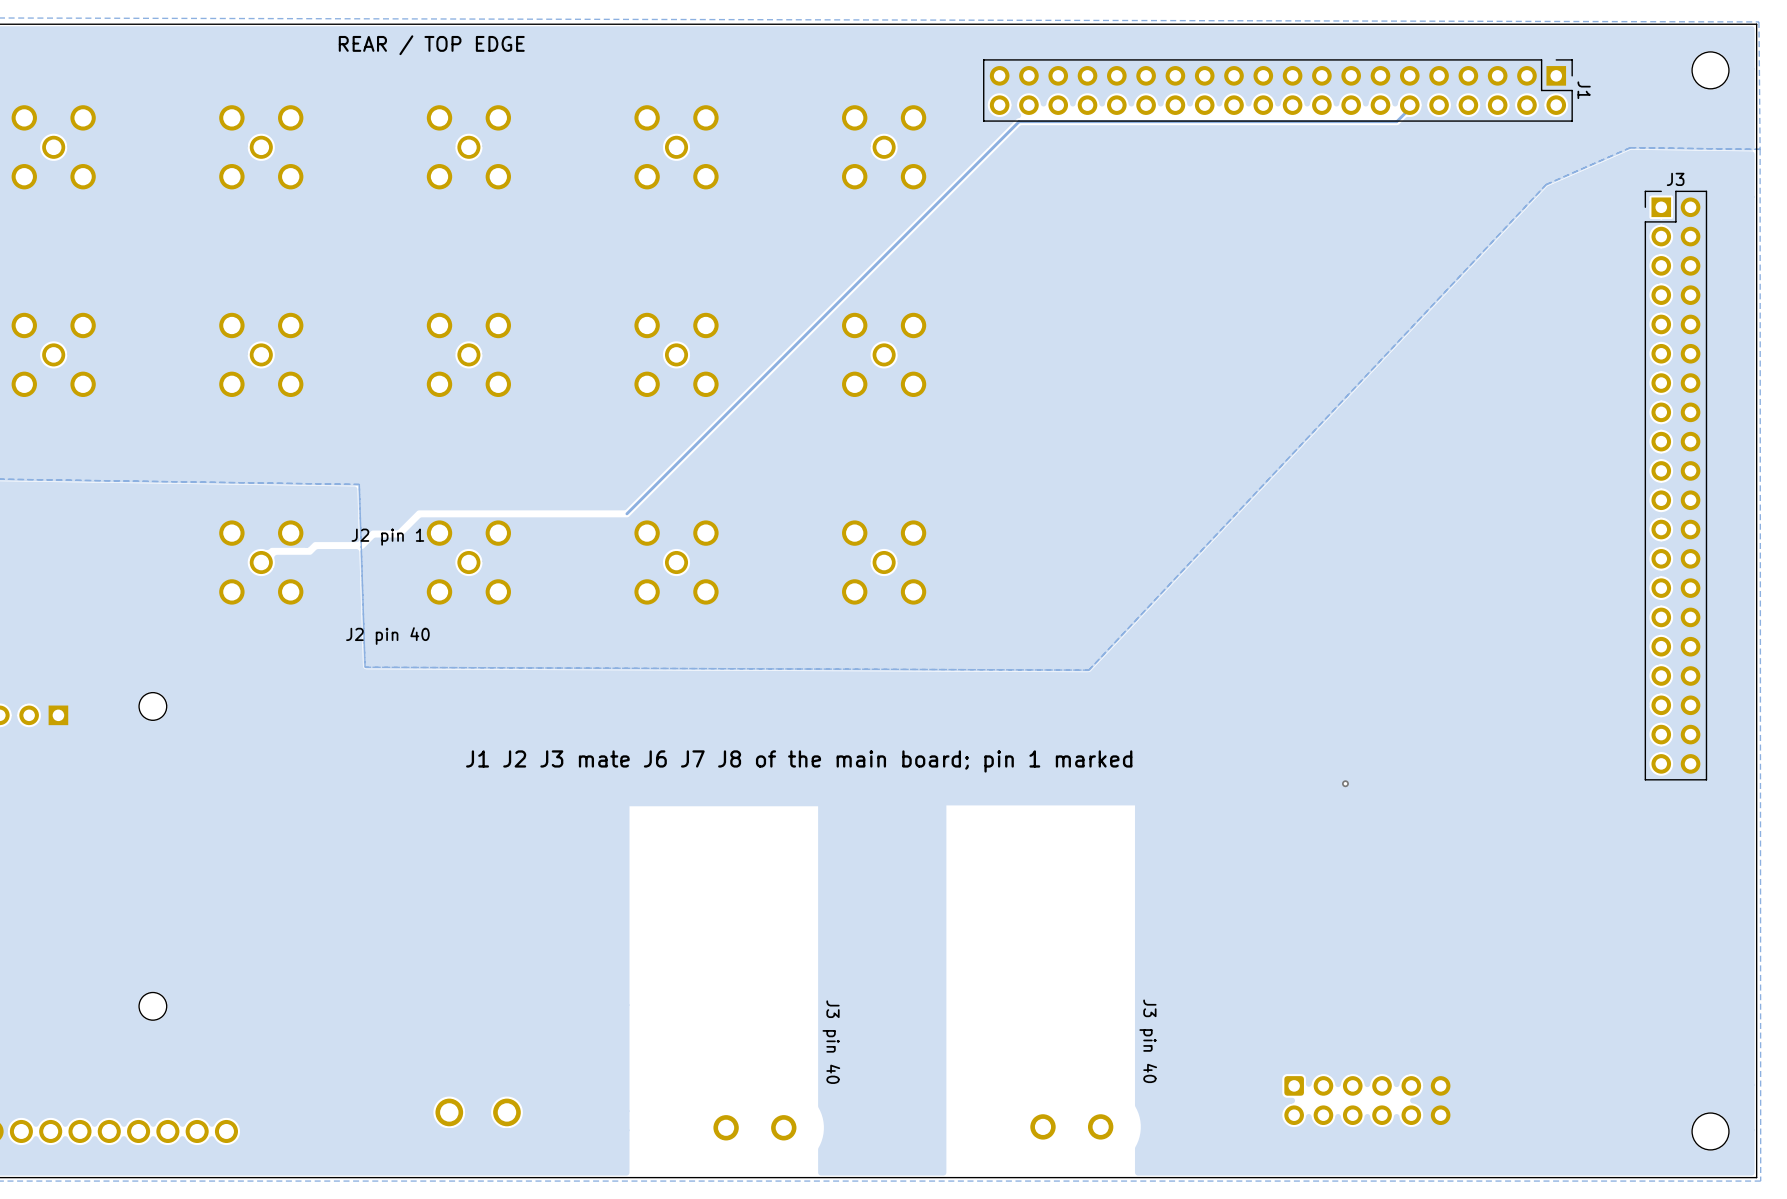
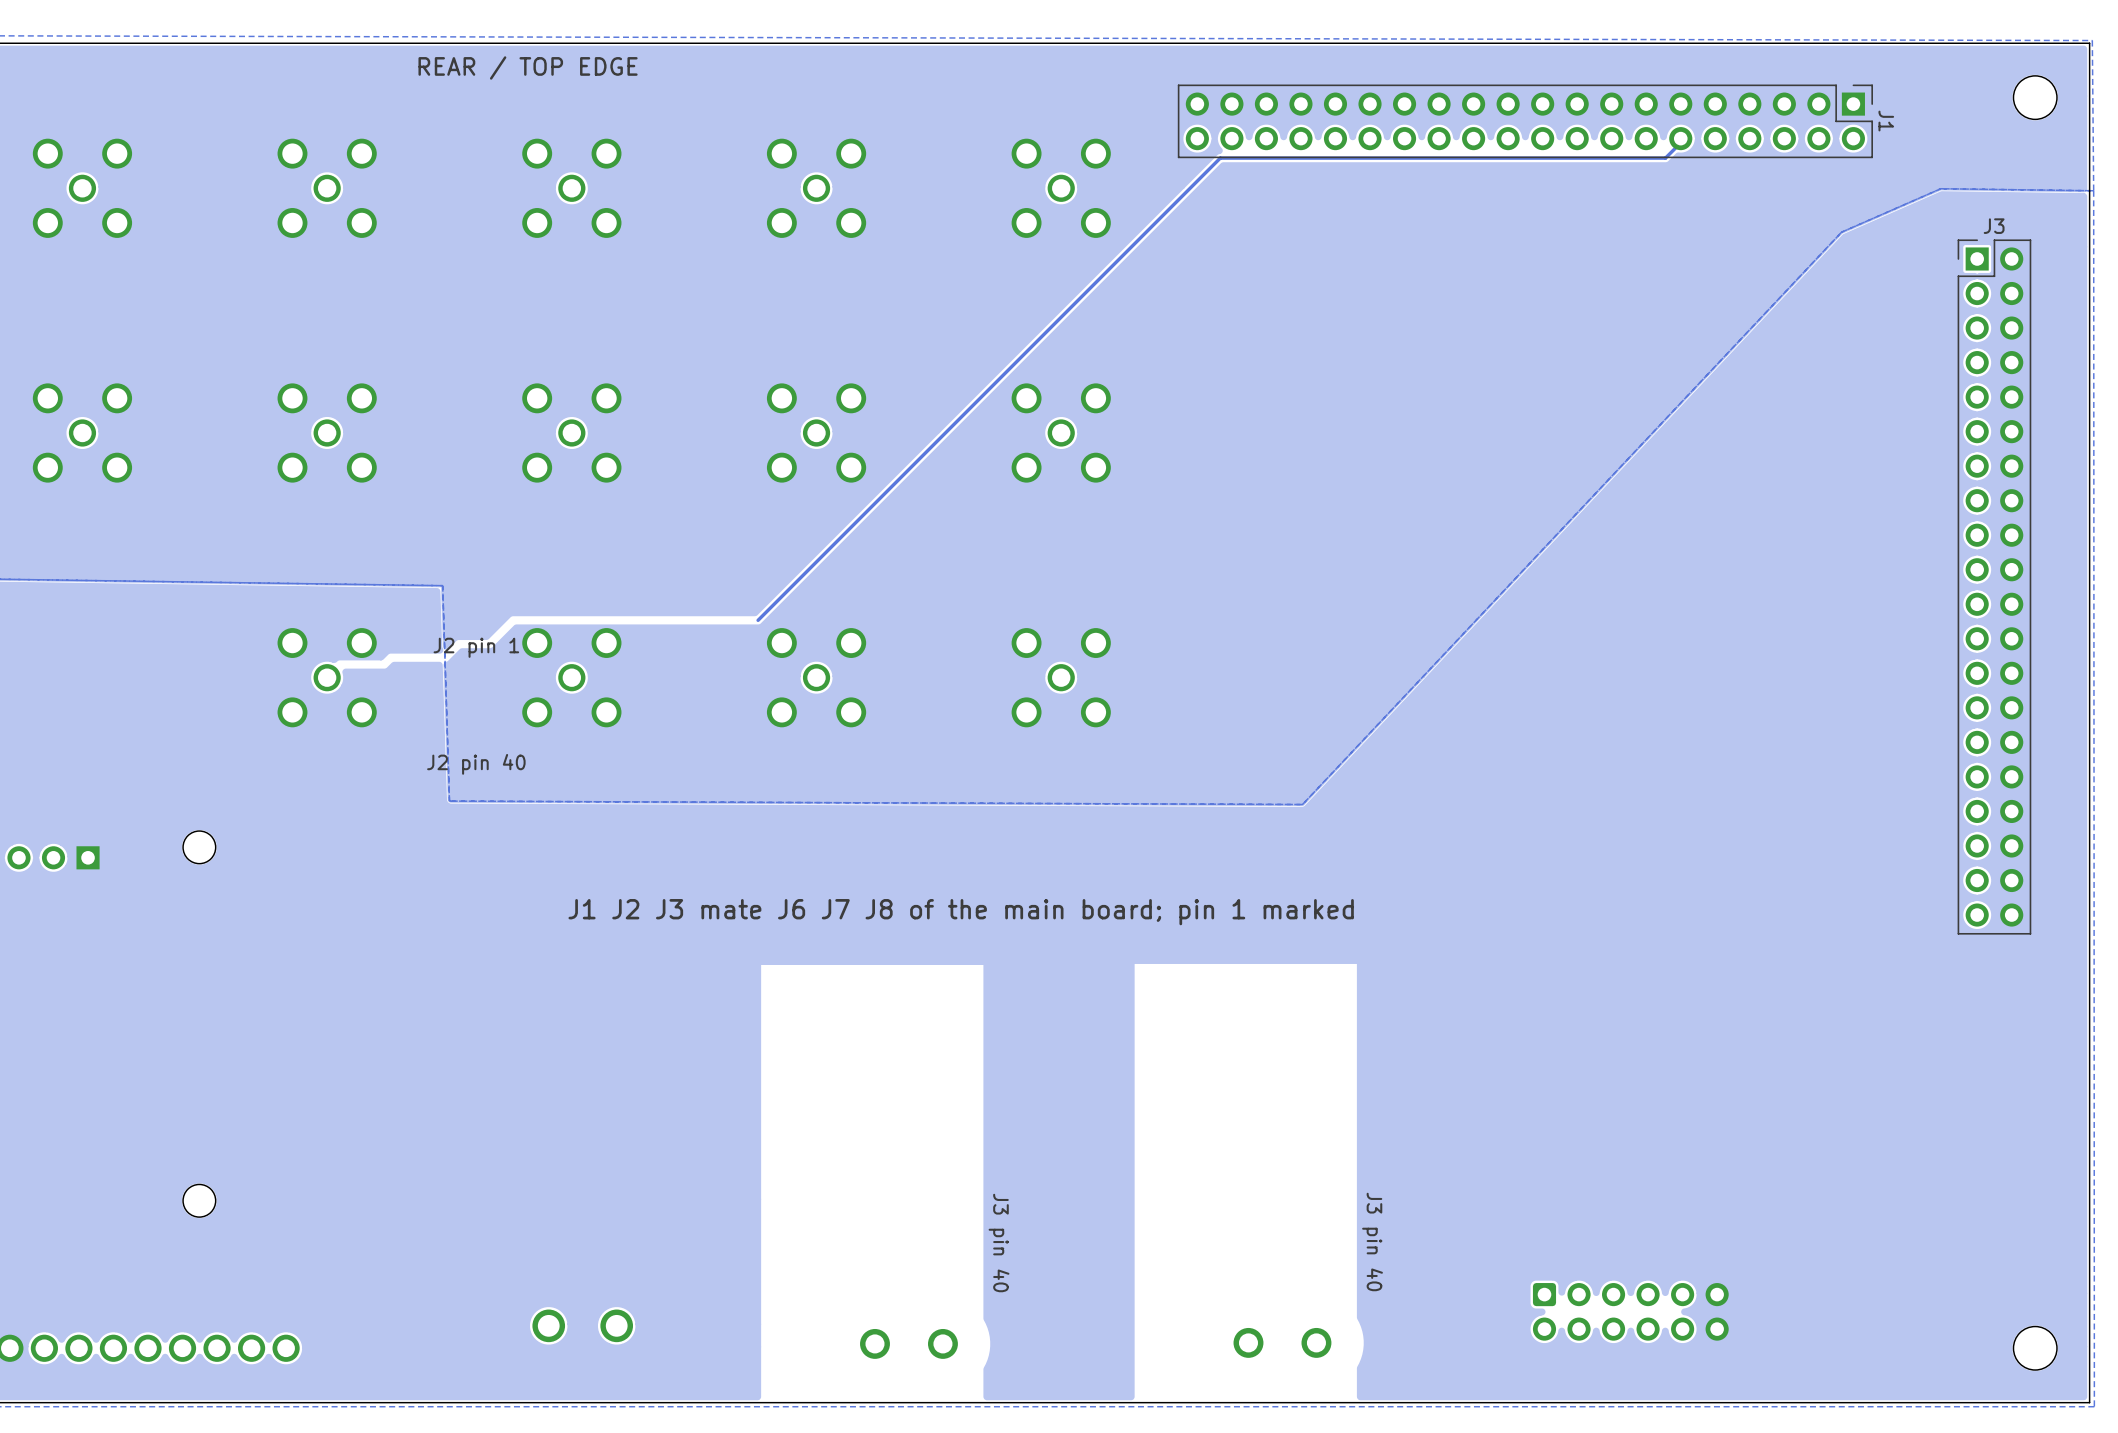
via: (1345, 783) -> none

